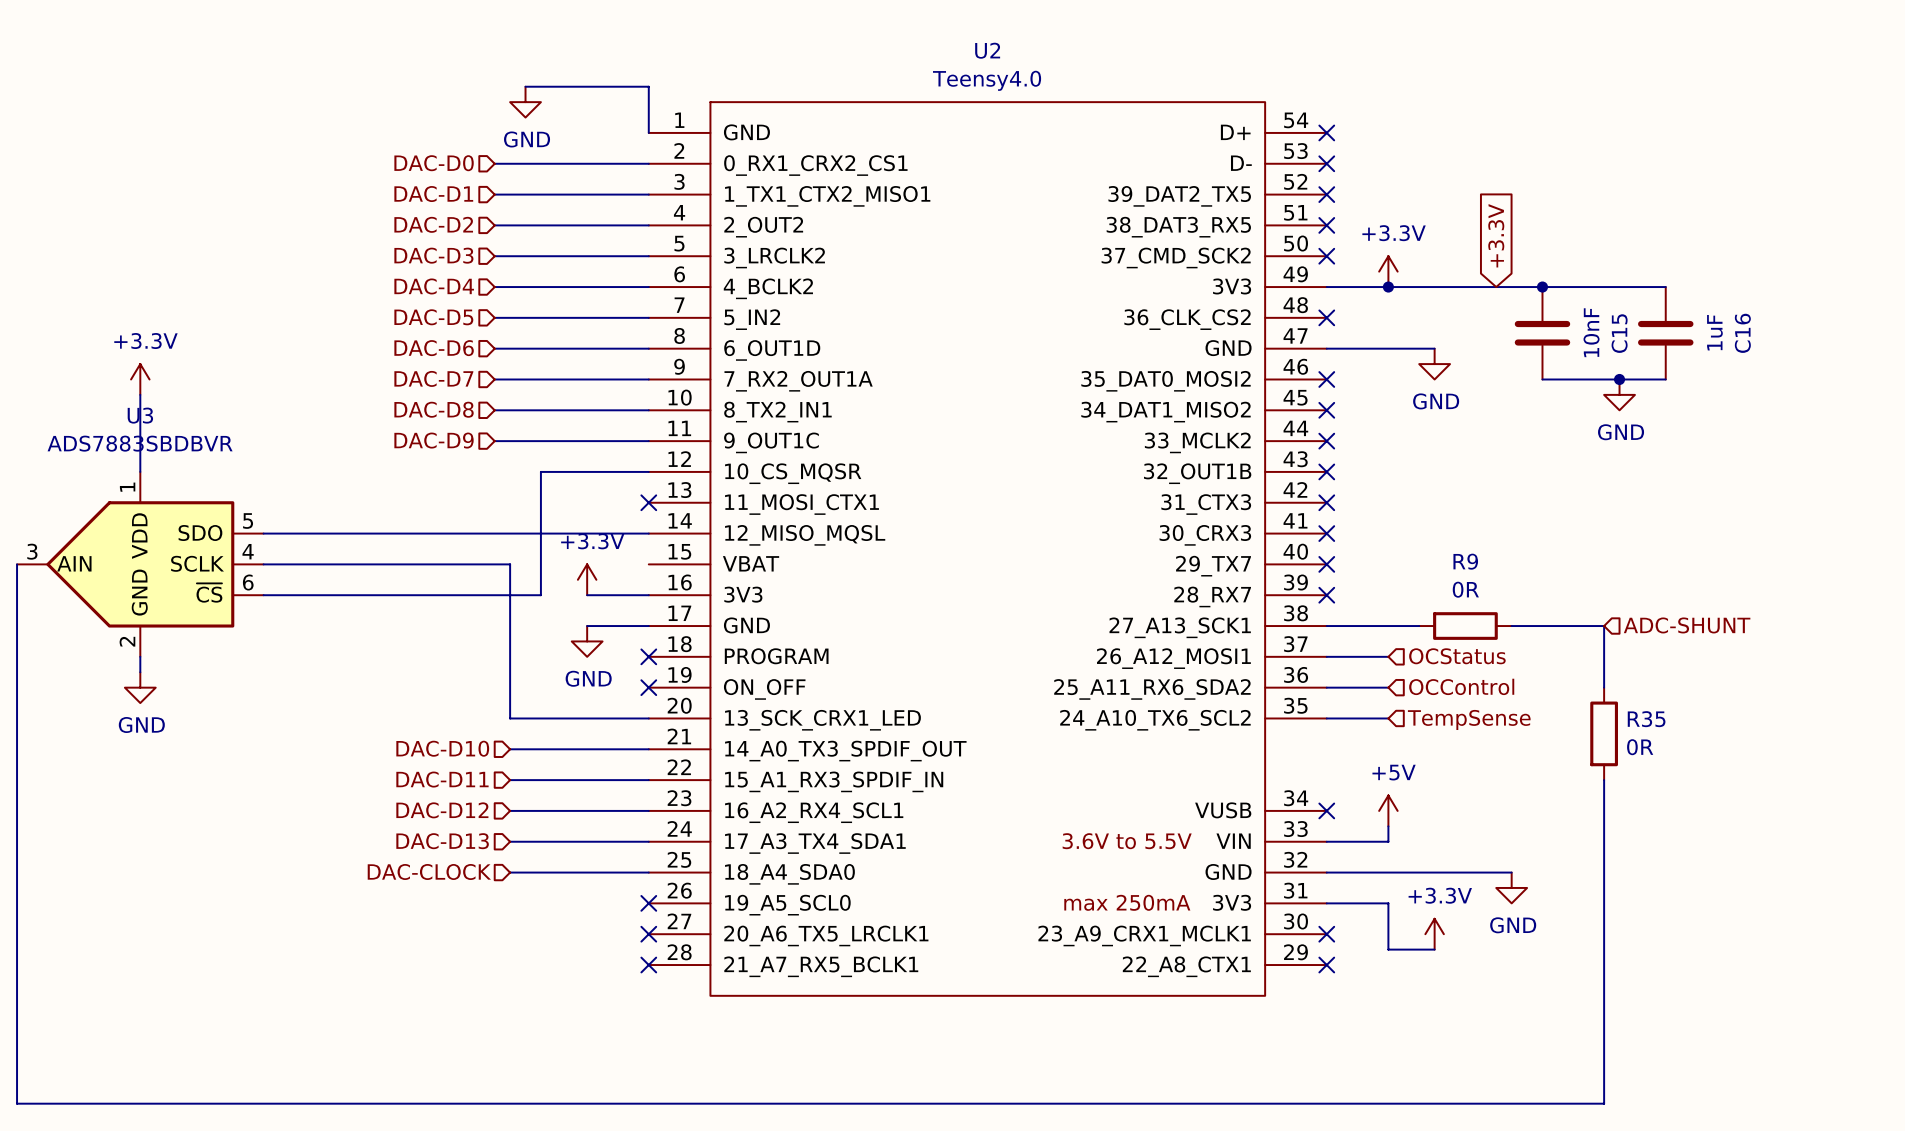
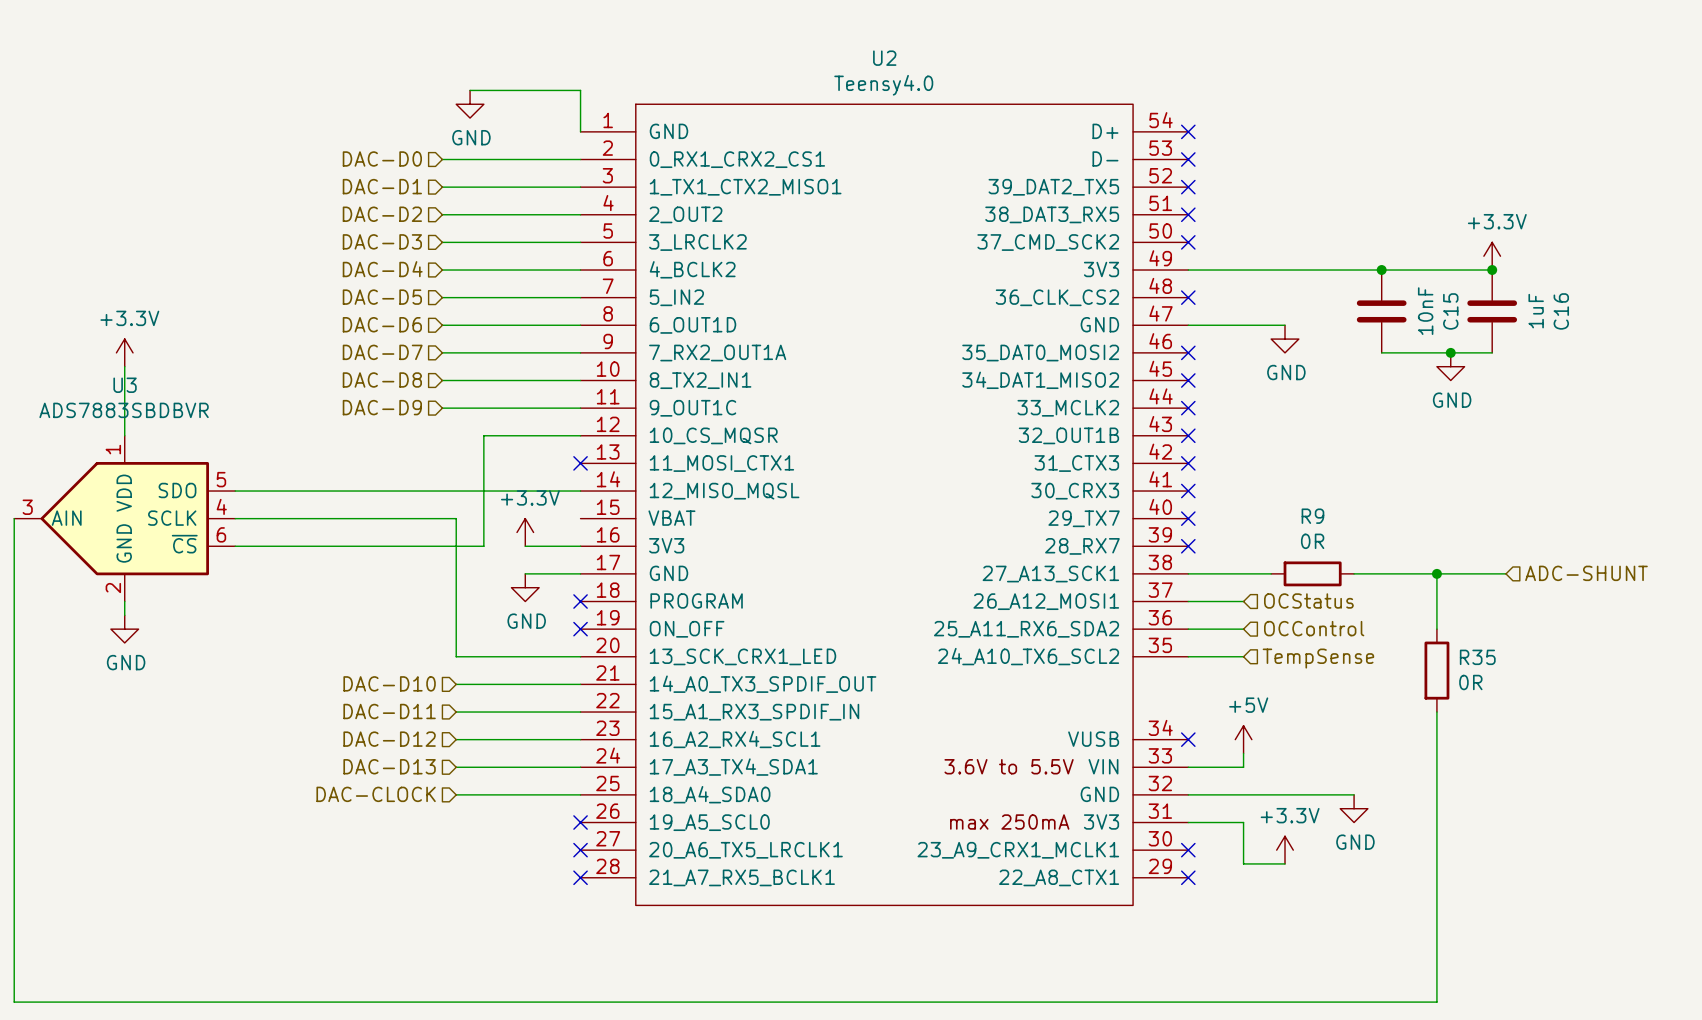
global label: +3.3V (1496, 235) -> none
power symbol position: +3.3V (1388, 271) -> +3.3V (1492, 256)
junction: (1388, 287) -> none
junction: none -> (1492, 270)
hierarchical label position: ADC-SHUNT (1687, 625) -> ADC-SHUNT (1586, 573)
wire: none -> (1436, 573) (1506, 573)
junction: none -> (1436, 573)

